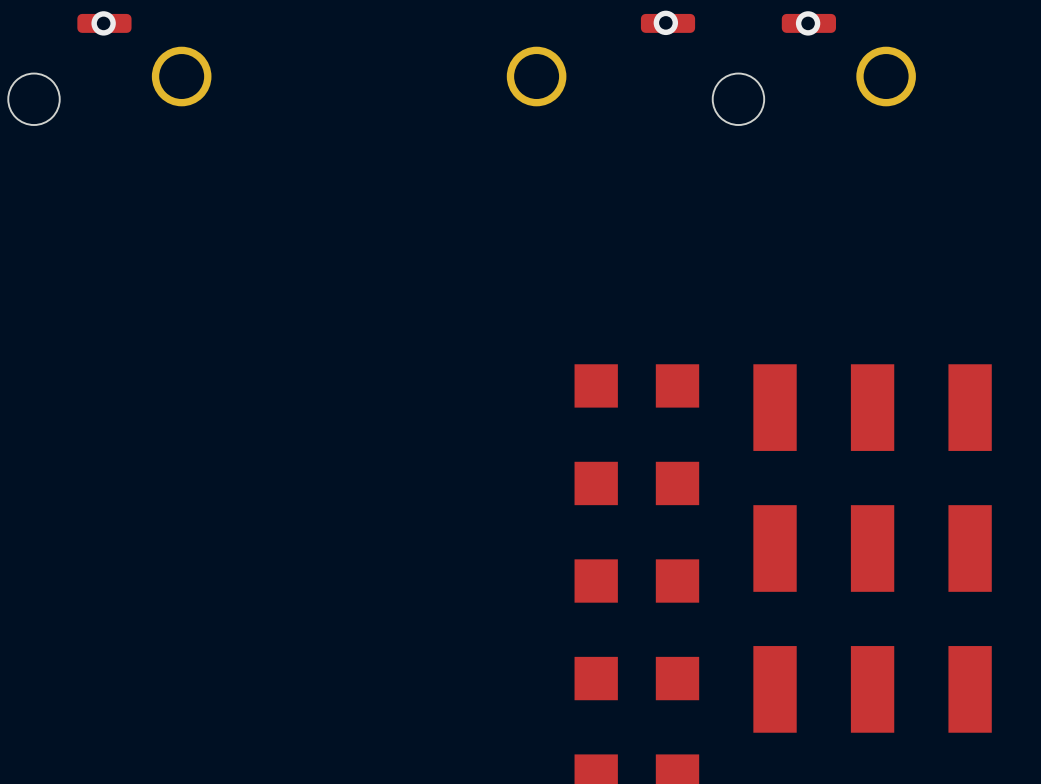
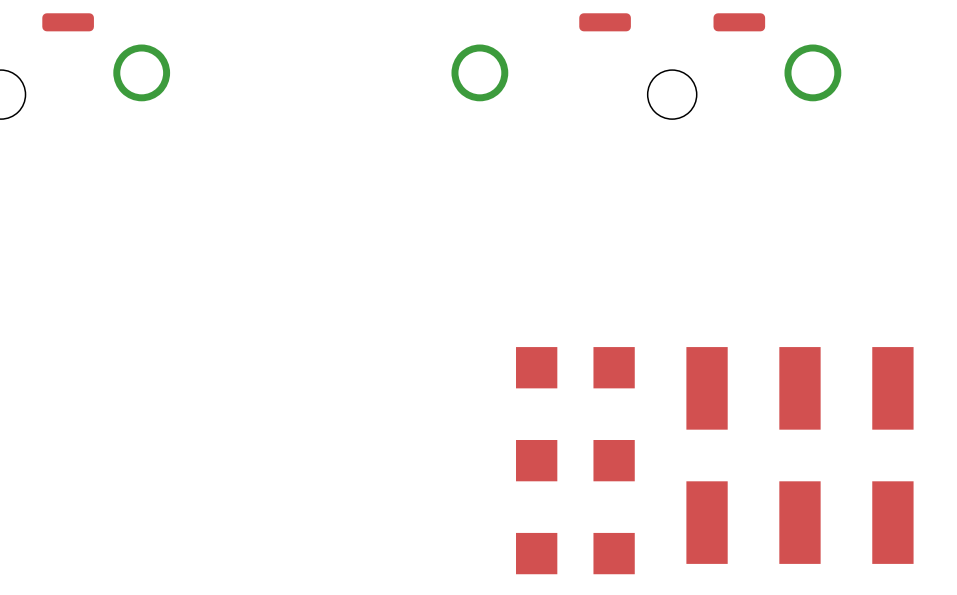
via: (665, 22) -> none
via: (103, 23) -> none
via: (808, 23) -> none

